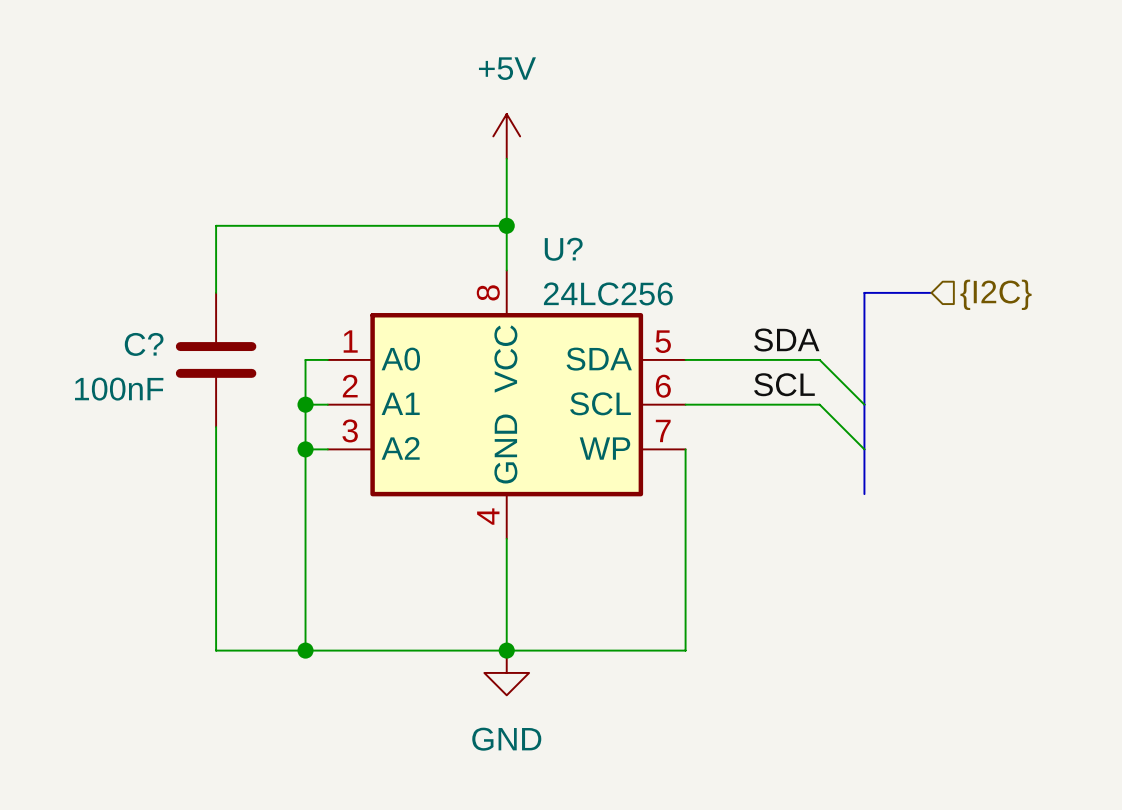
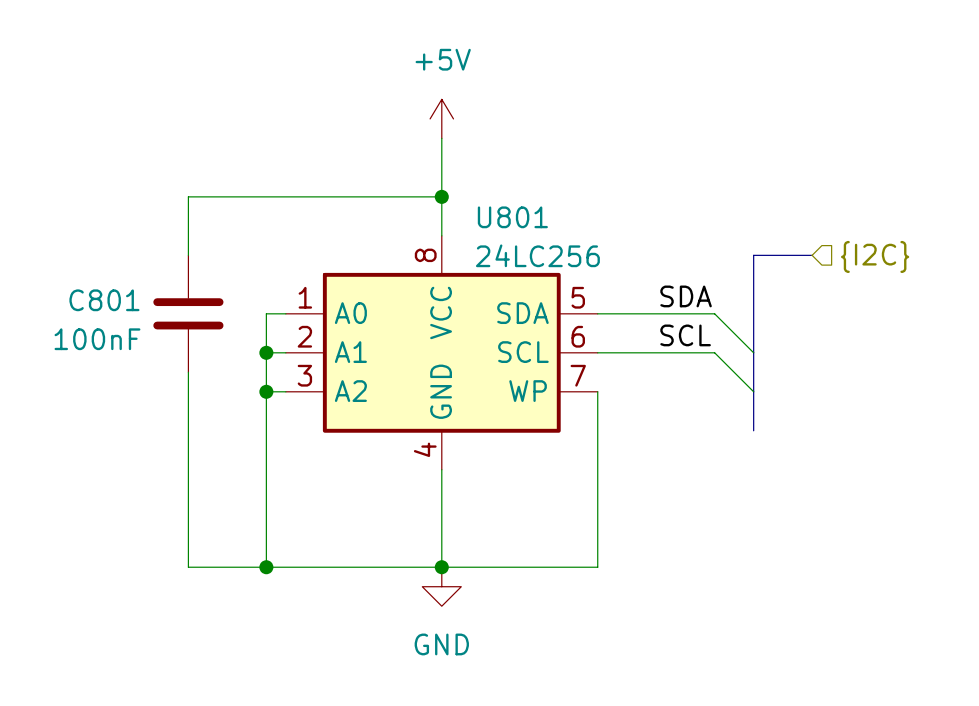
U? name: U? (563, 249) -> U801 (512, 217)
C? name: C? (144, 344) -> C801 (104, 300)

